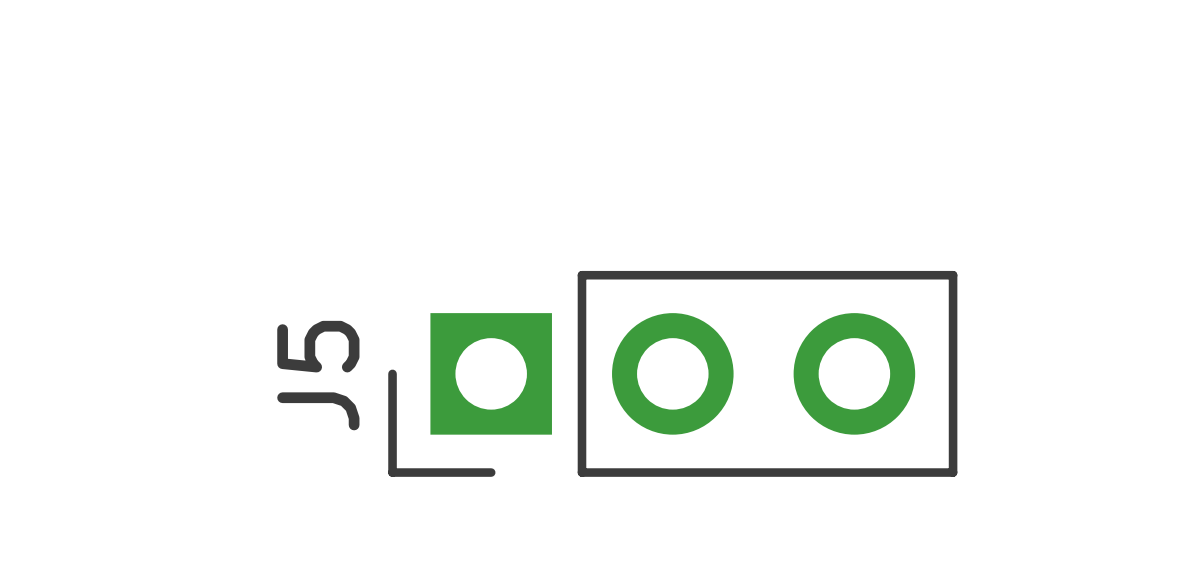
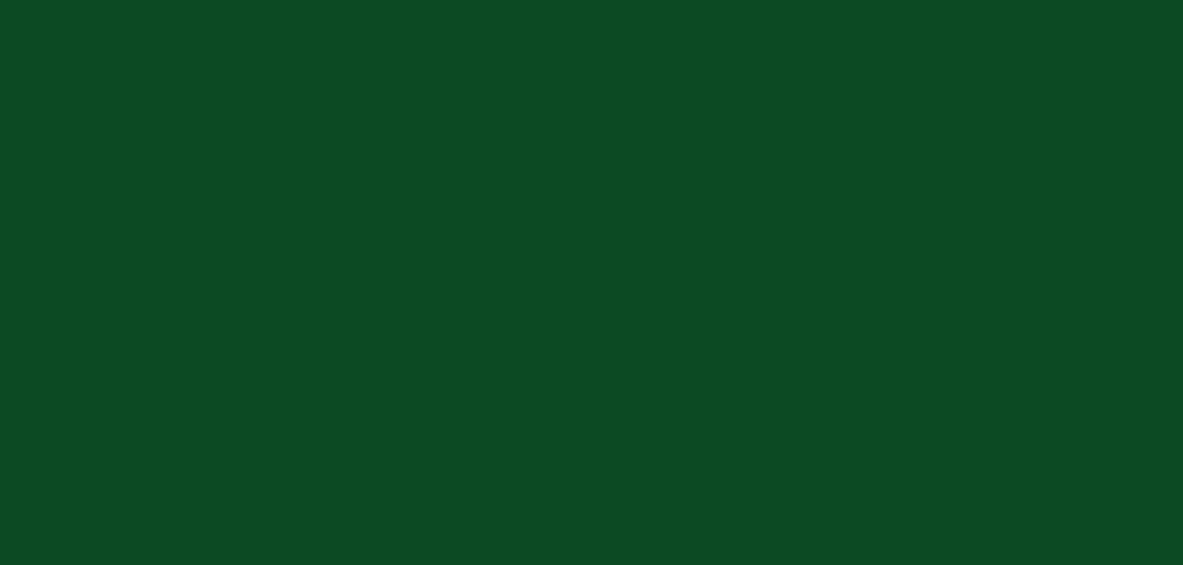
J5: (672, 373) -> none

